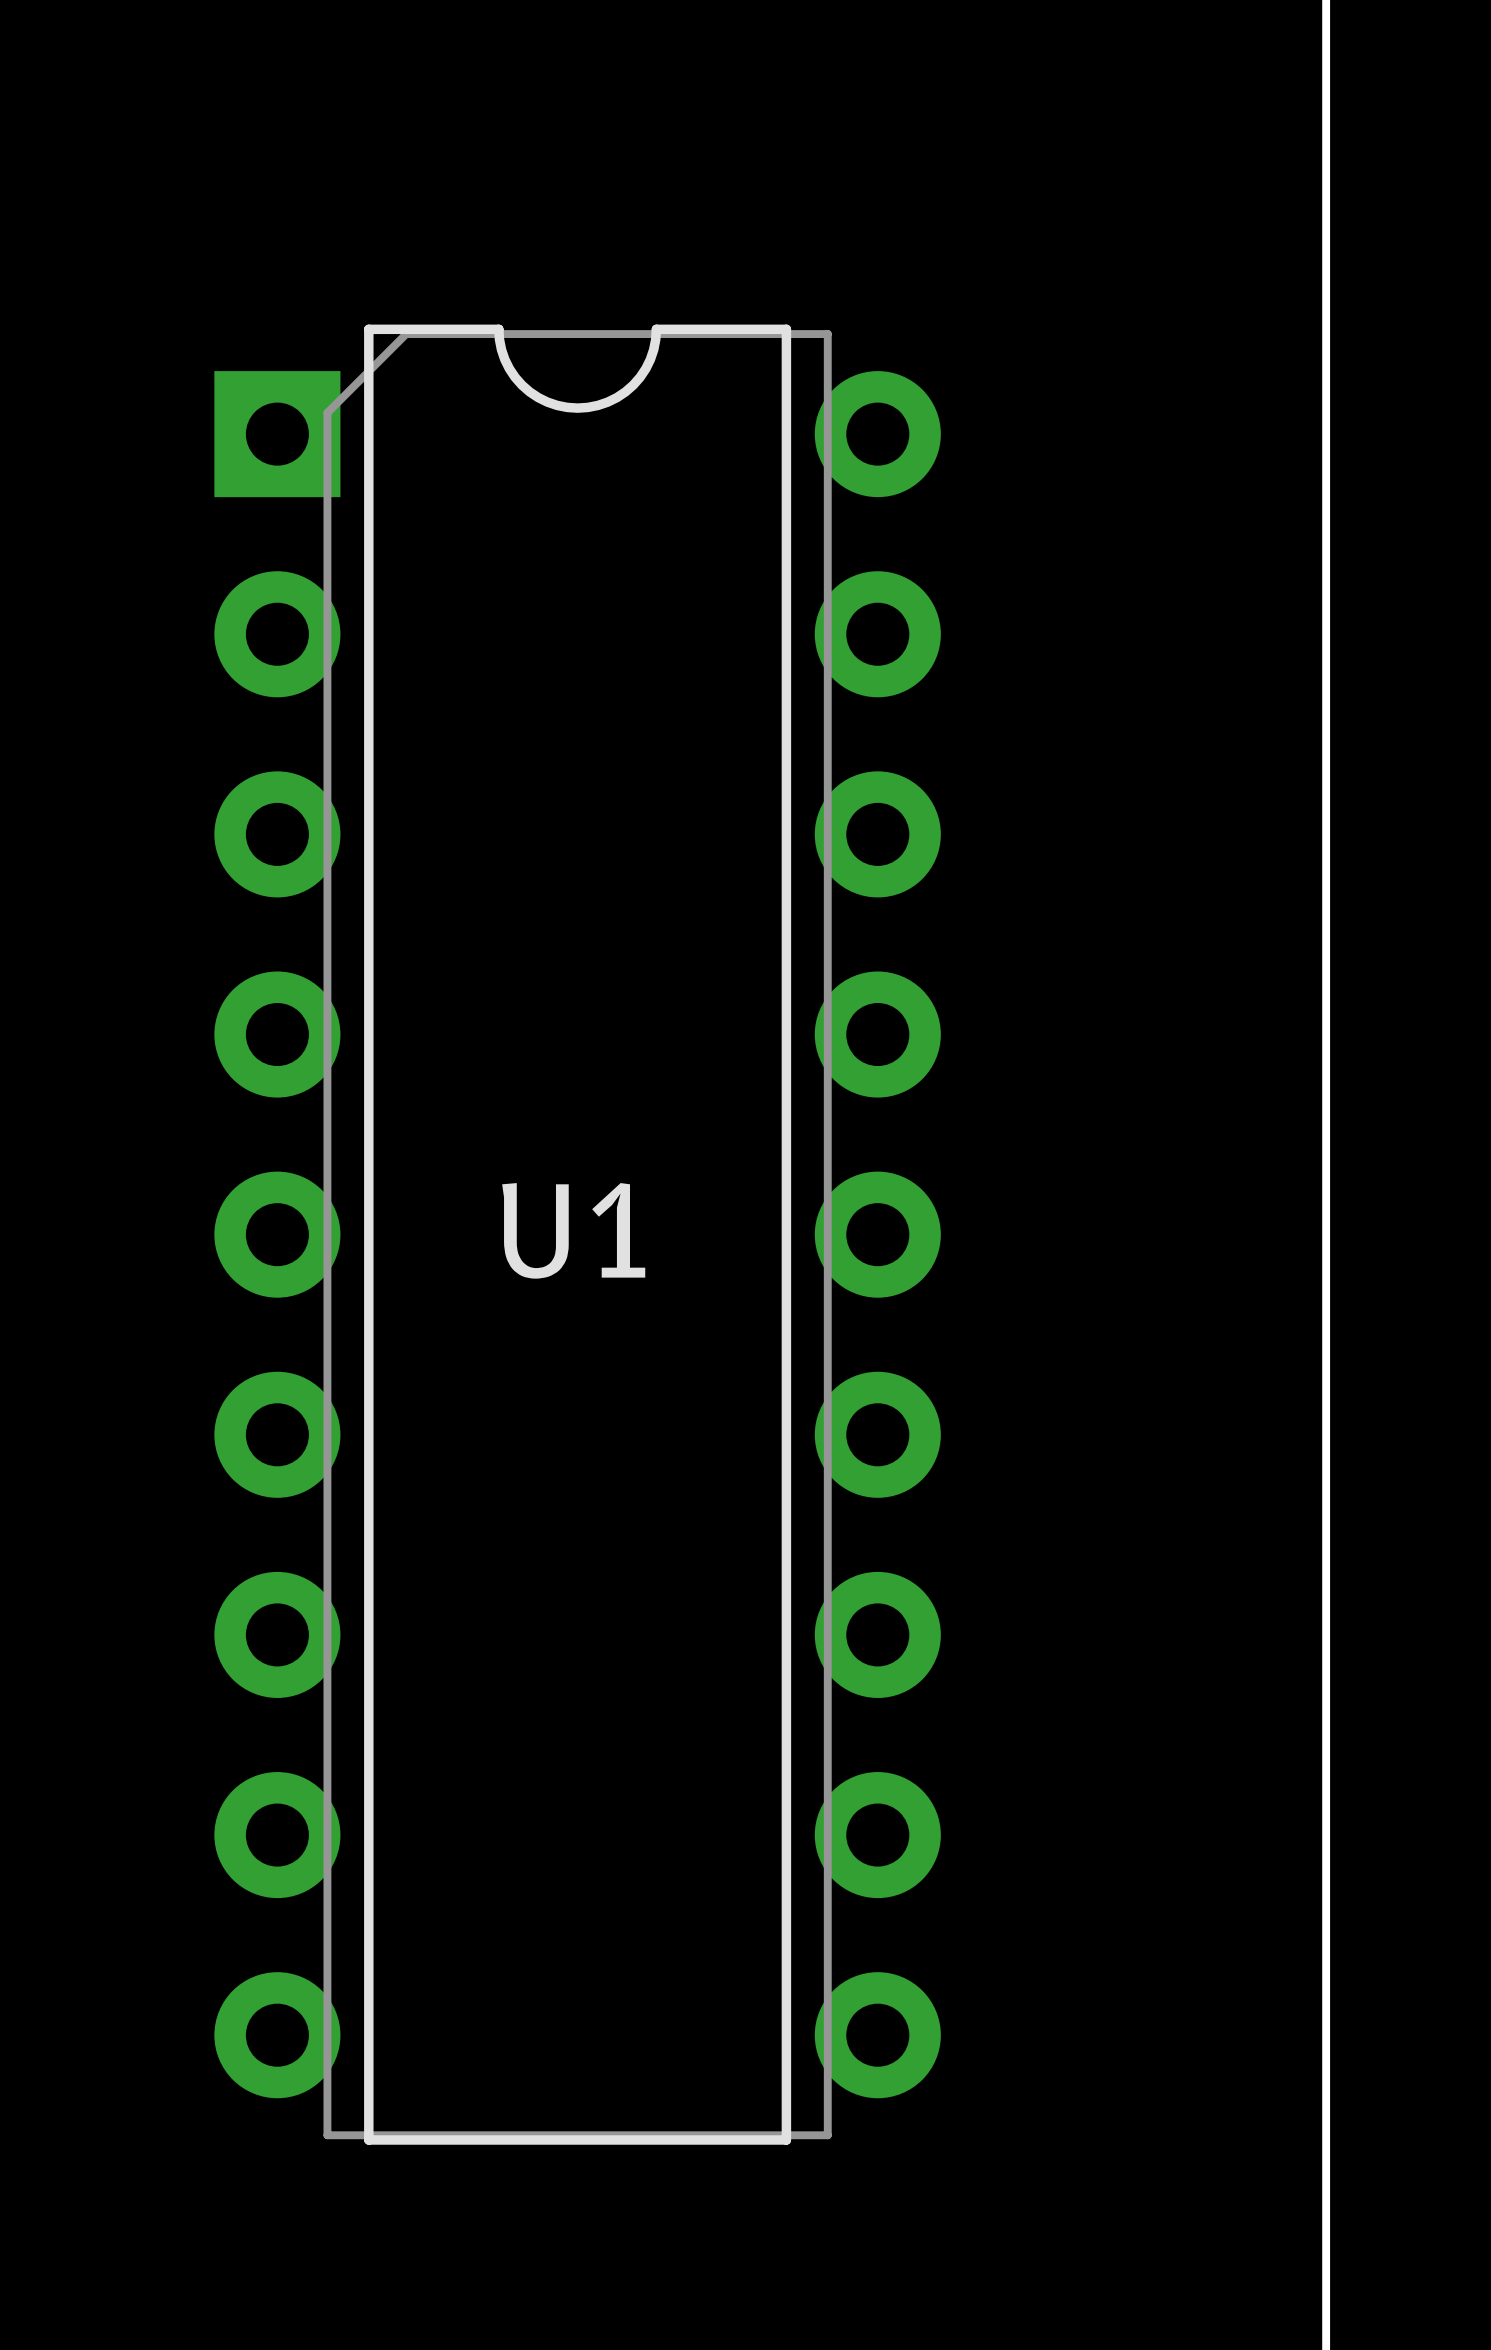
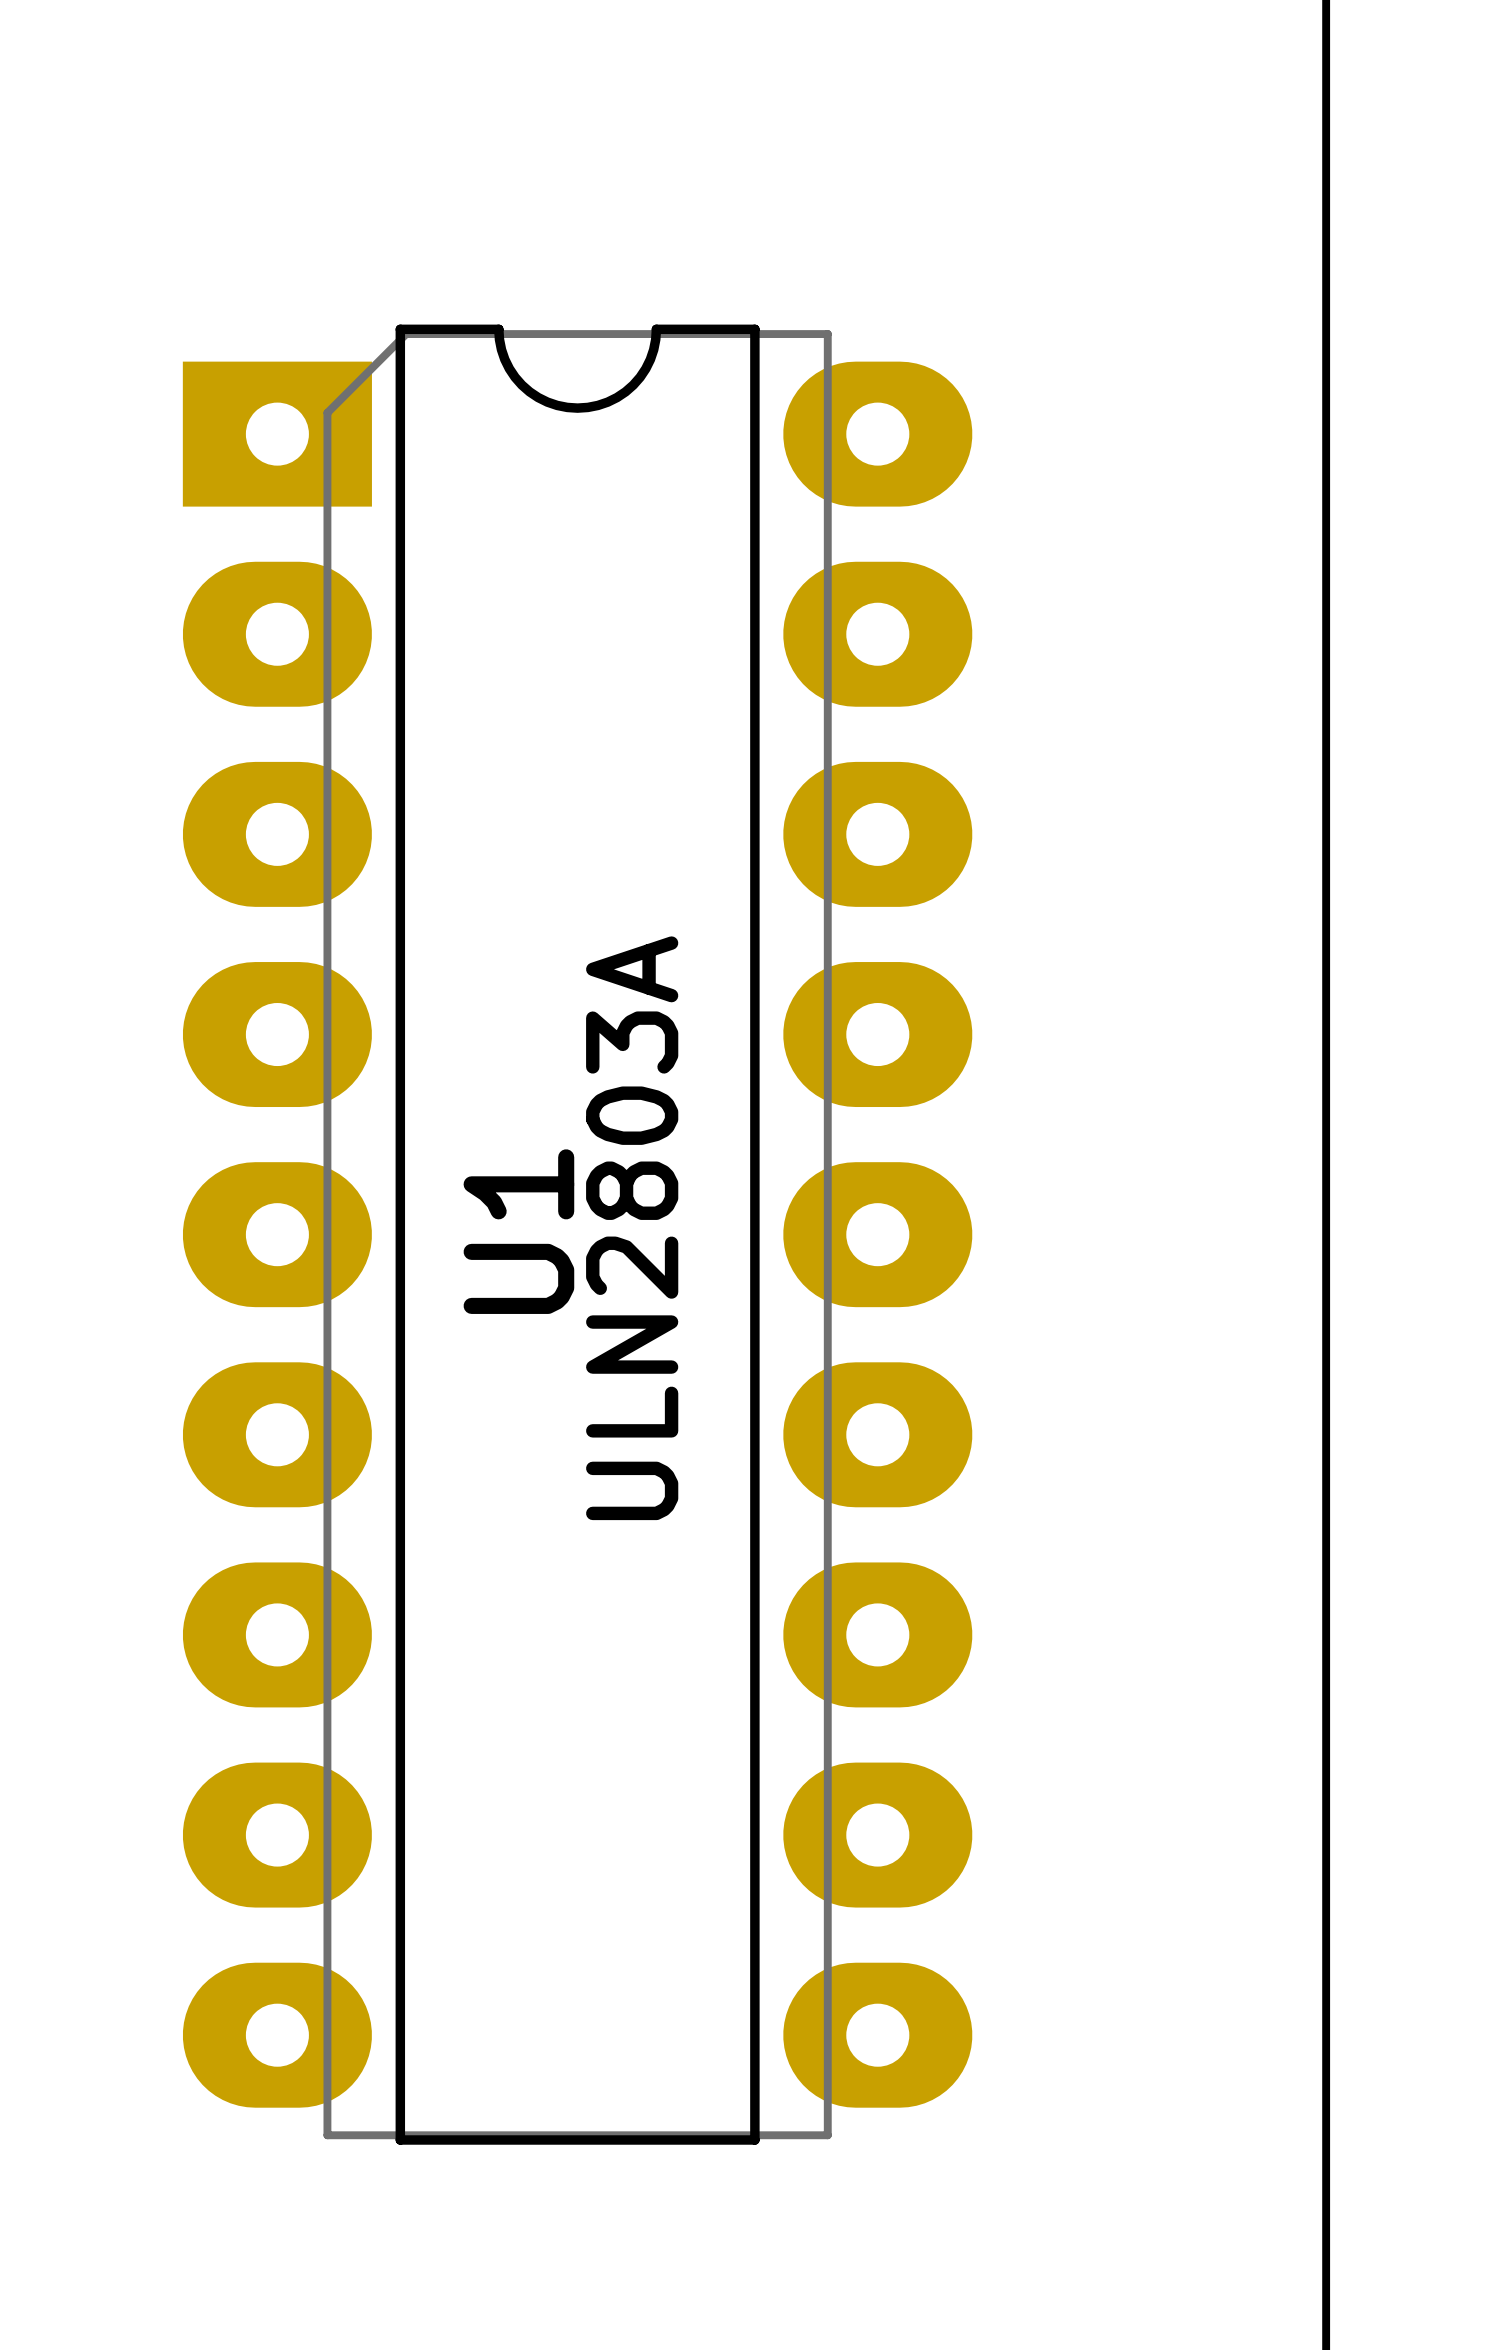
U1 footprint: [214, 324, 941, 2145] -> [182, 324, 973, 2145]
U1 value: none -> ULN2803A (632, 1228)

